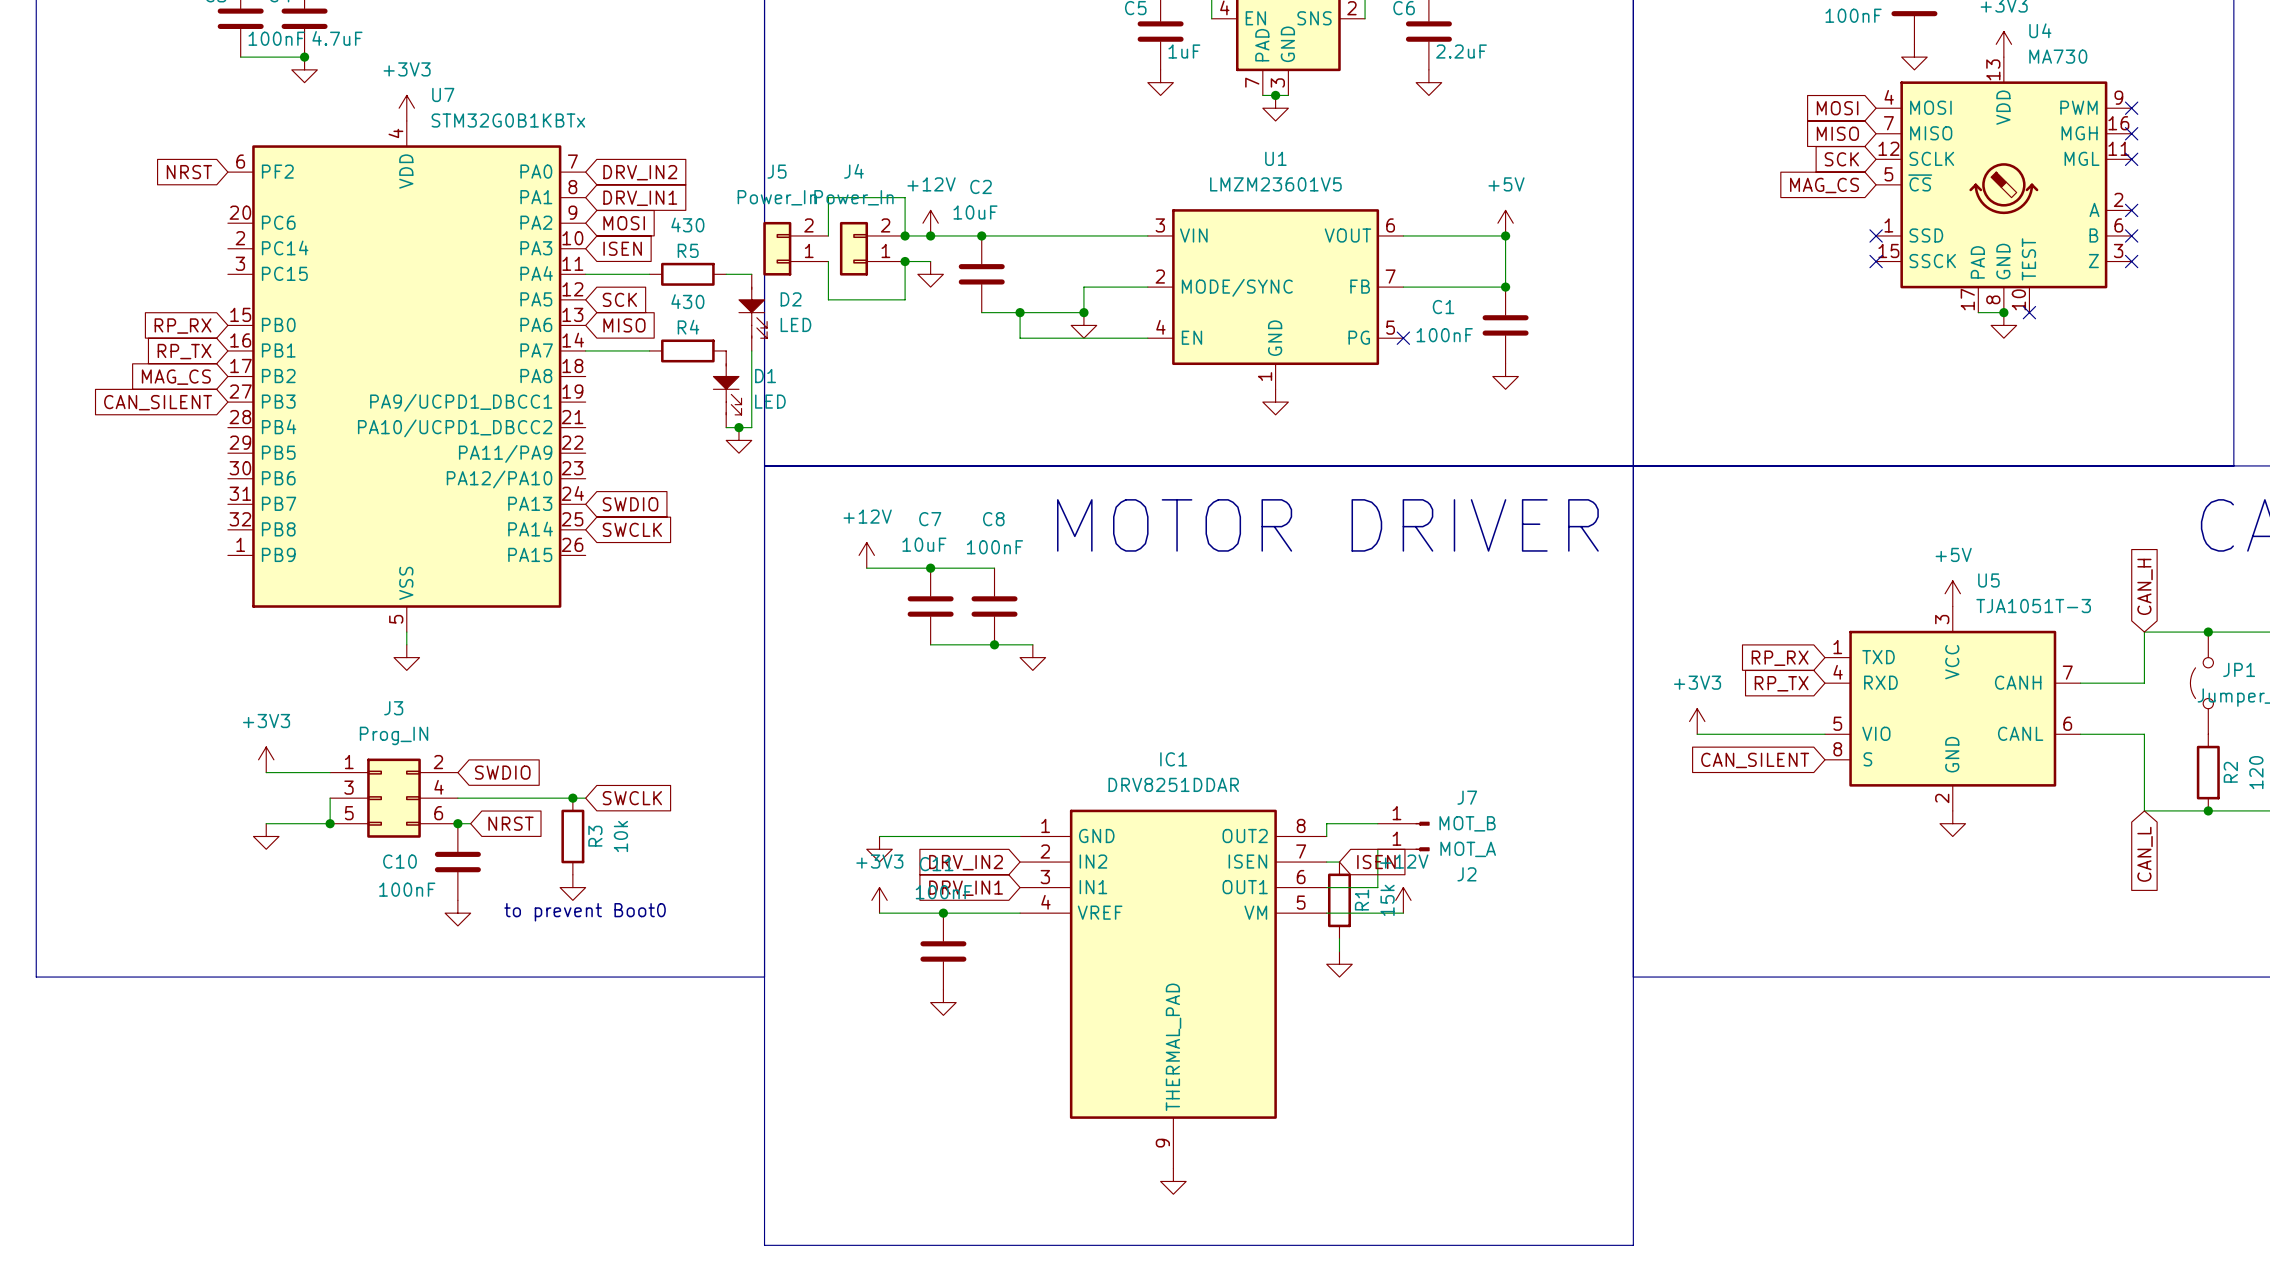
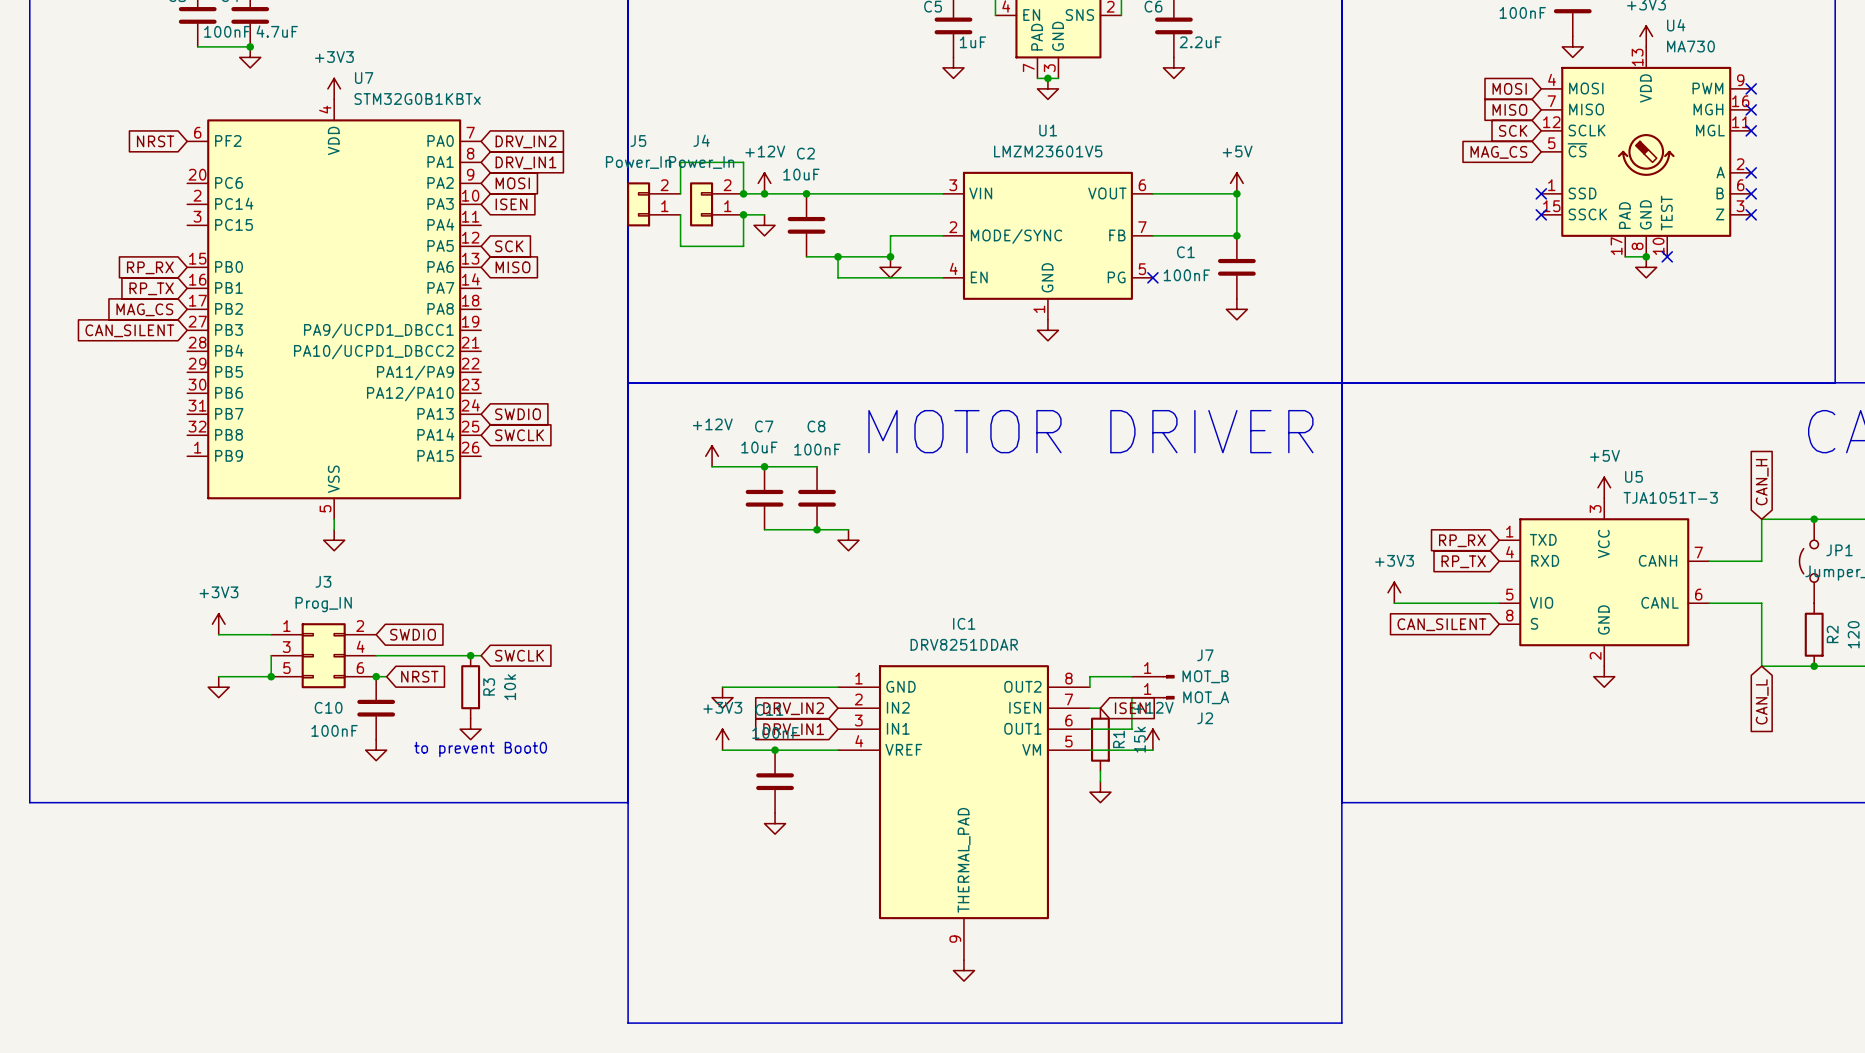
wire: (585, 274) (649, 274) -> none
R5: 430 (687, 274) -> none
wire: (726, 274) (751, 274) -> none
D2: LED (753, 312) -> none
wire: (585, 350) (649, 350) -> none
R4: 430 (687, 350) -> none
wire: (751, 350) (751, 427) (726, 427) -> none
D1: LED (727, 389) -> none
junction: (738, 427) -> none
power symbol: (738, 440) -> none

